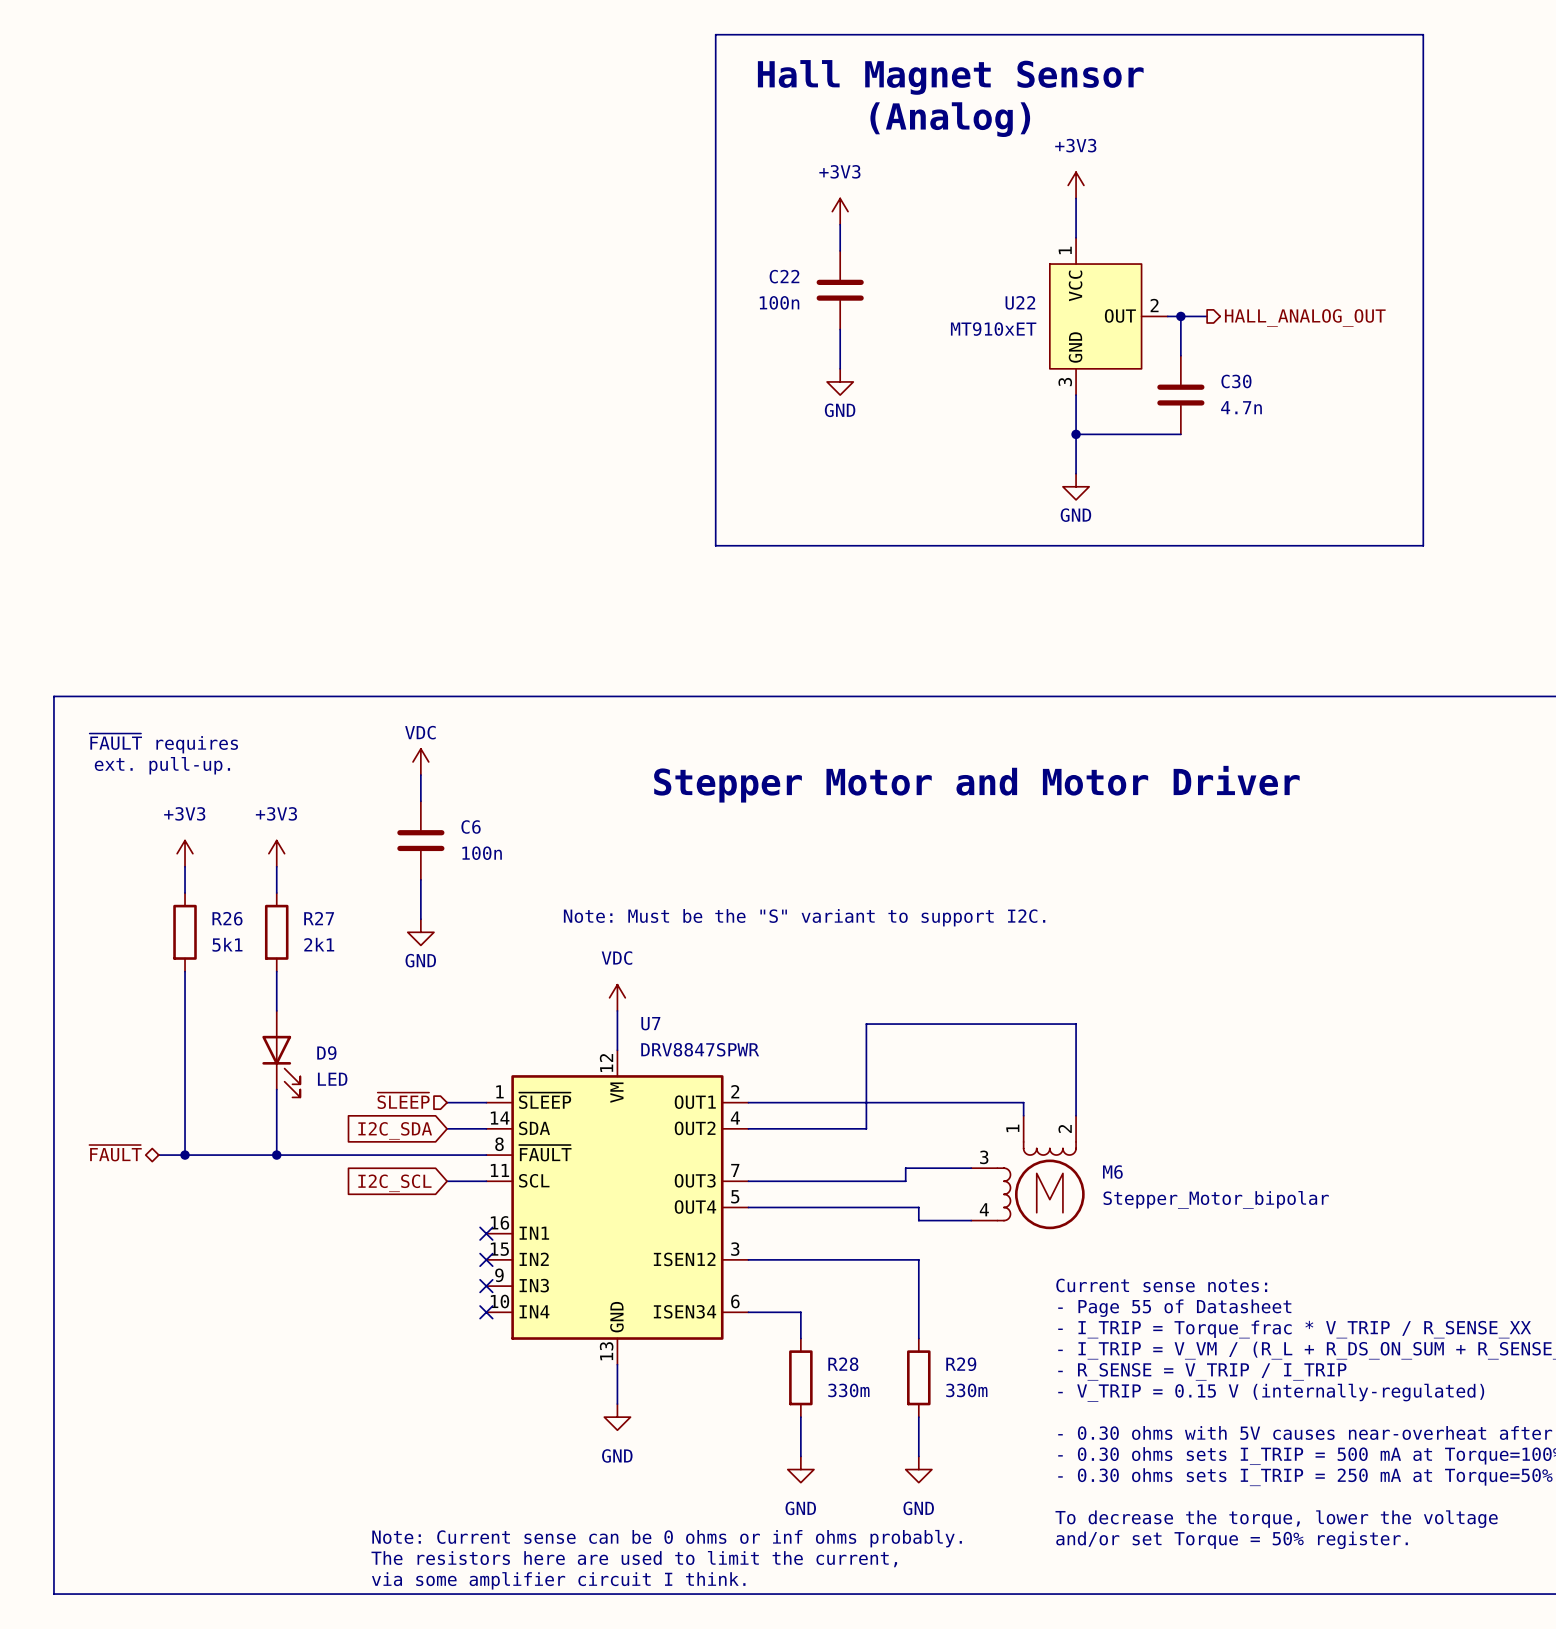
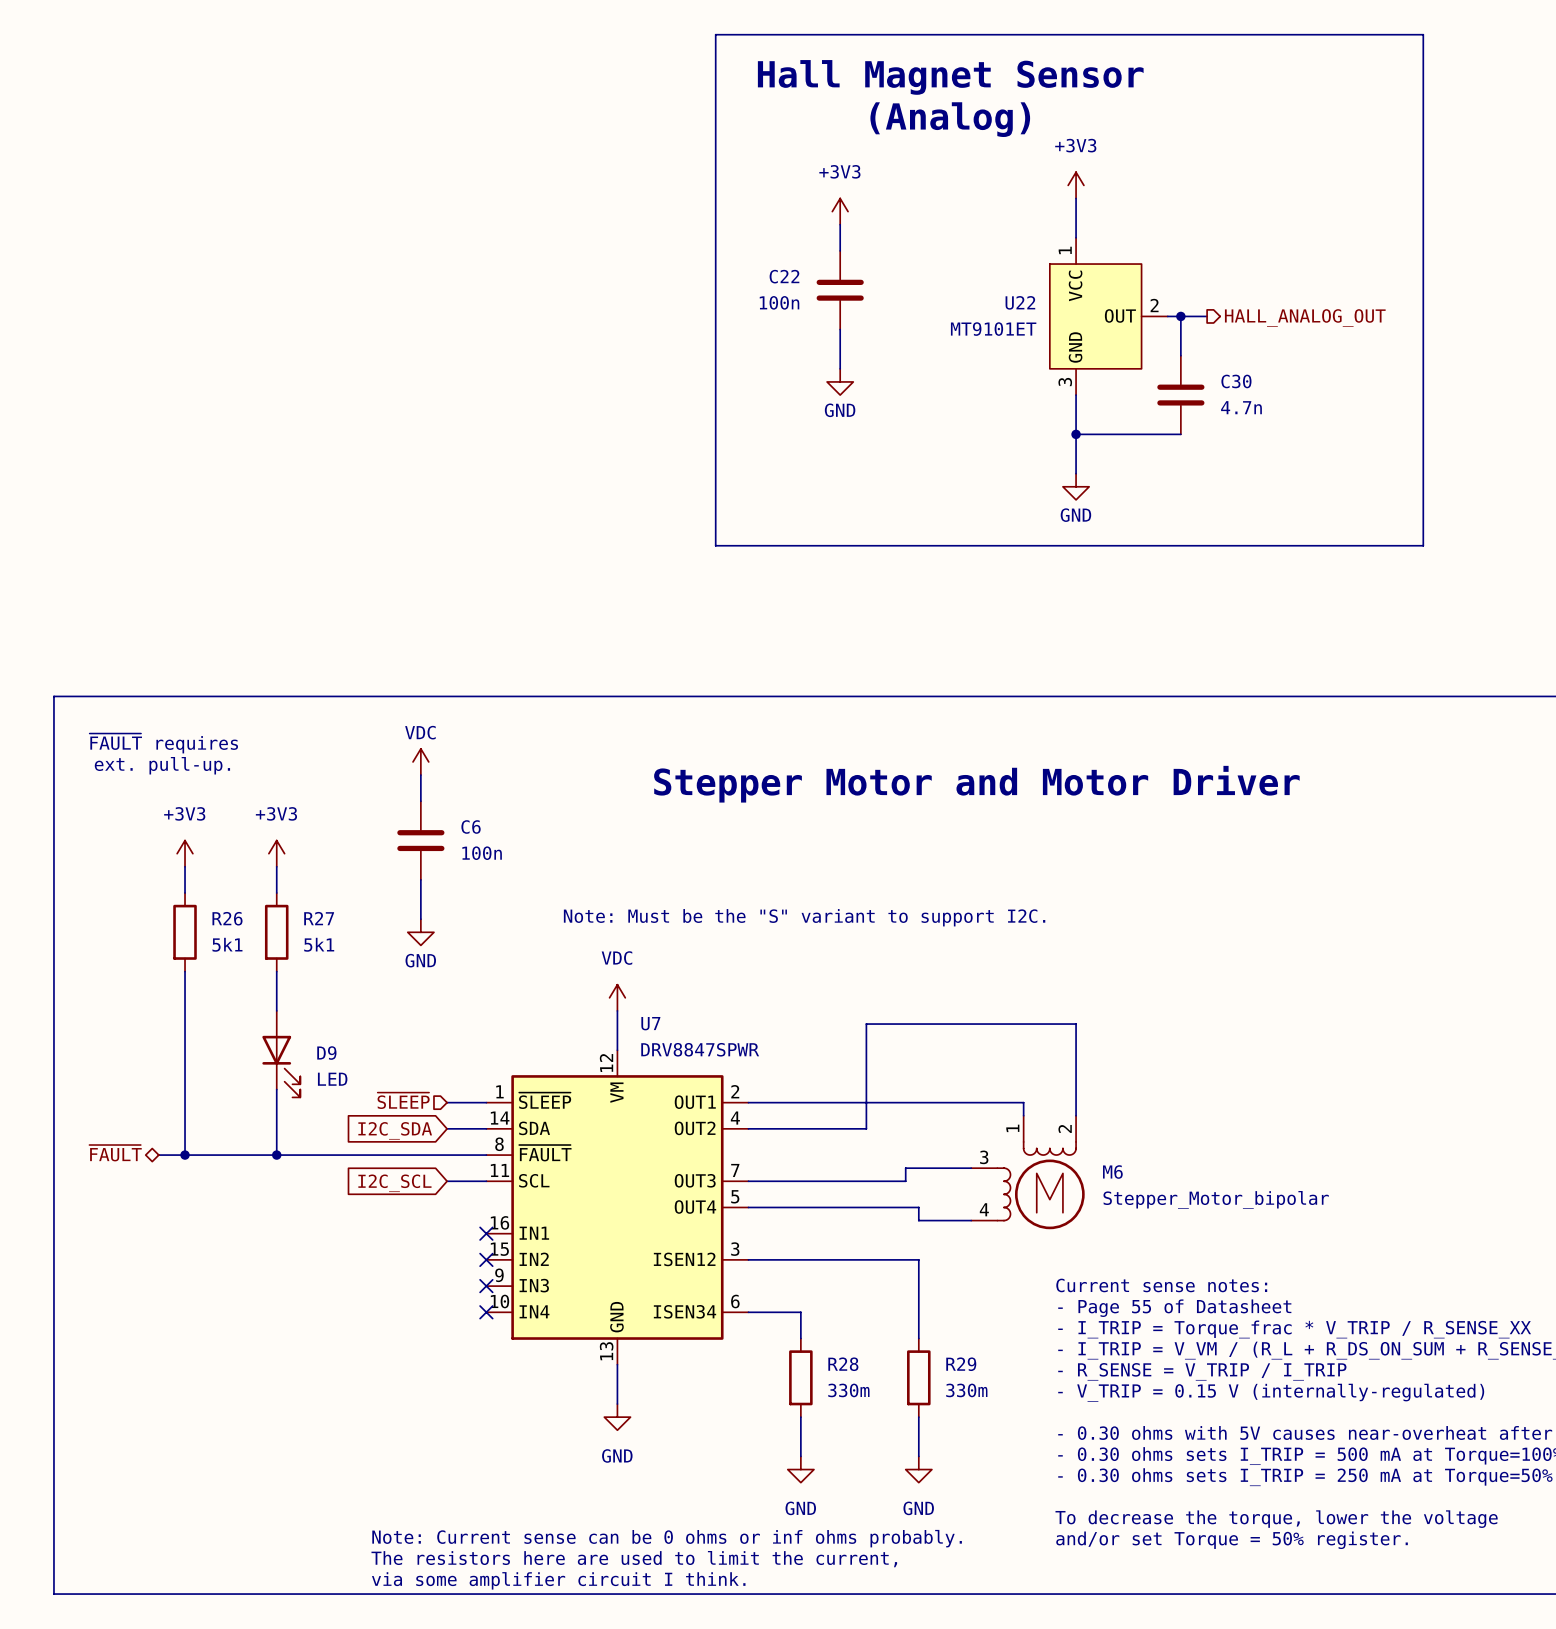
U22 value: MT910xET (993, 329) -> MT9101ET (993, 329)
R27 value: 2k1 (319, 944) -> 5k1 (319, 944)

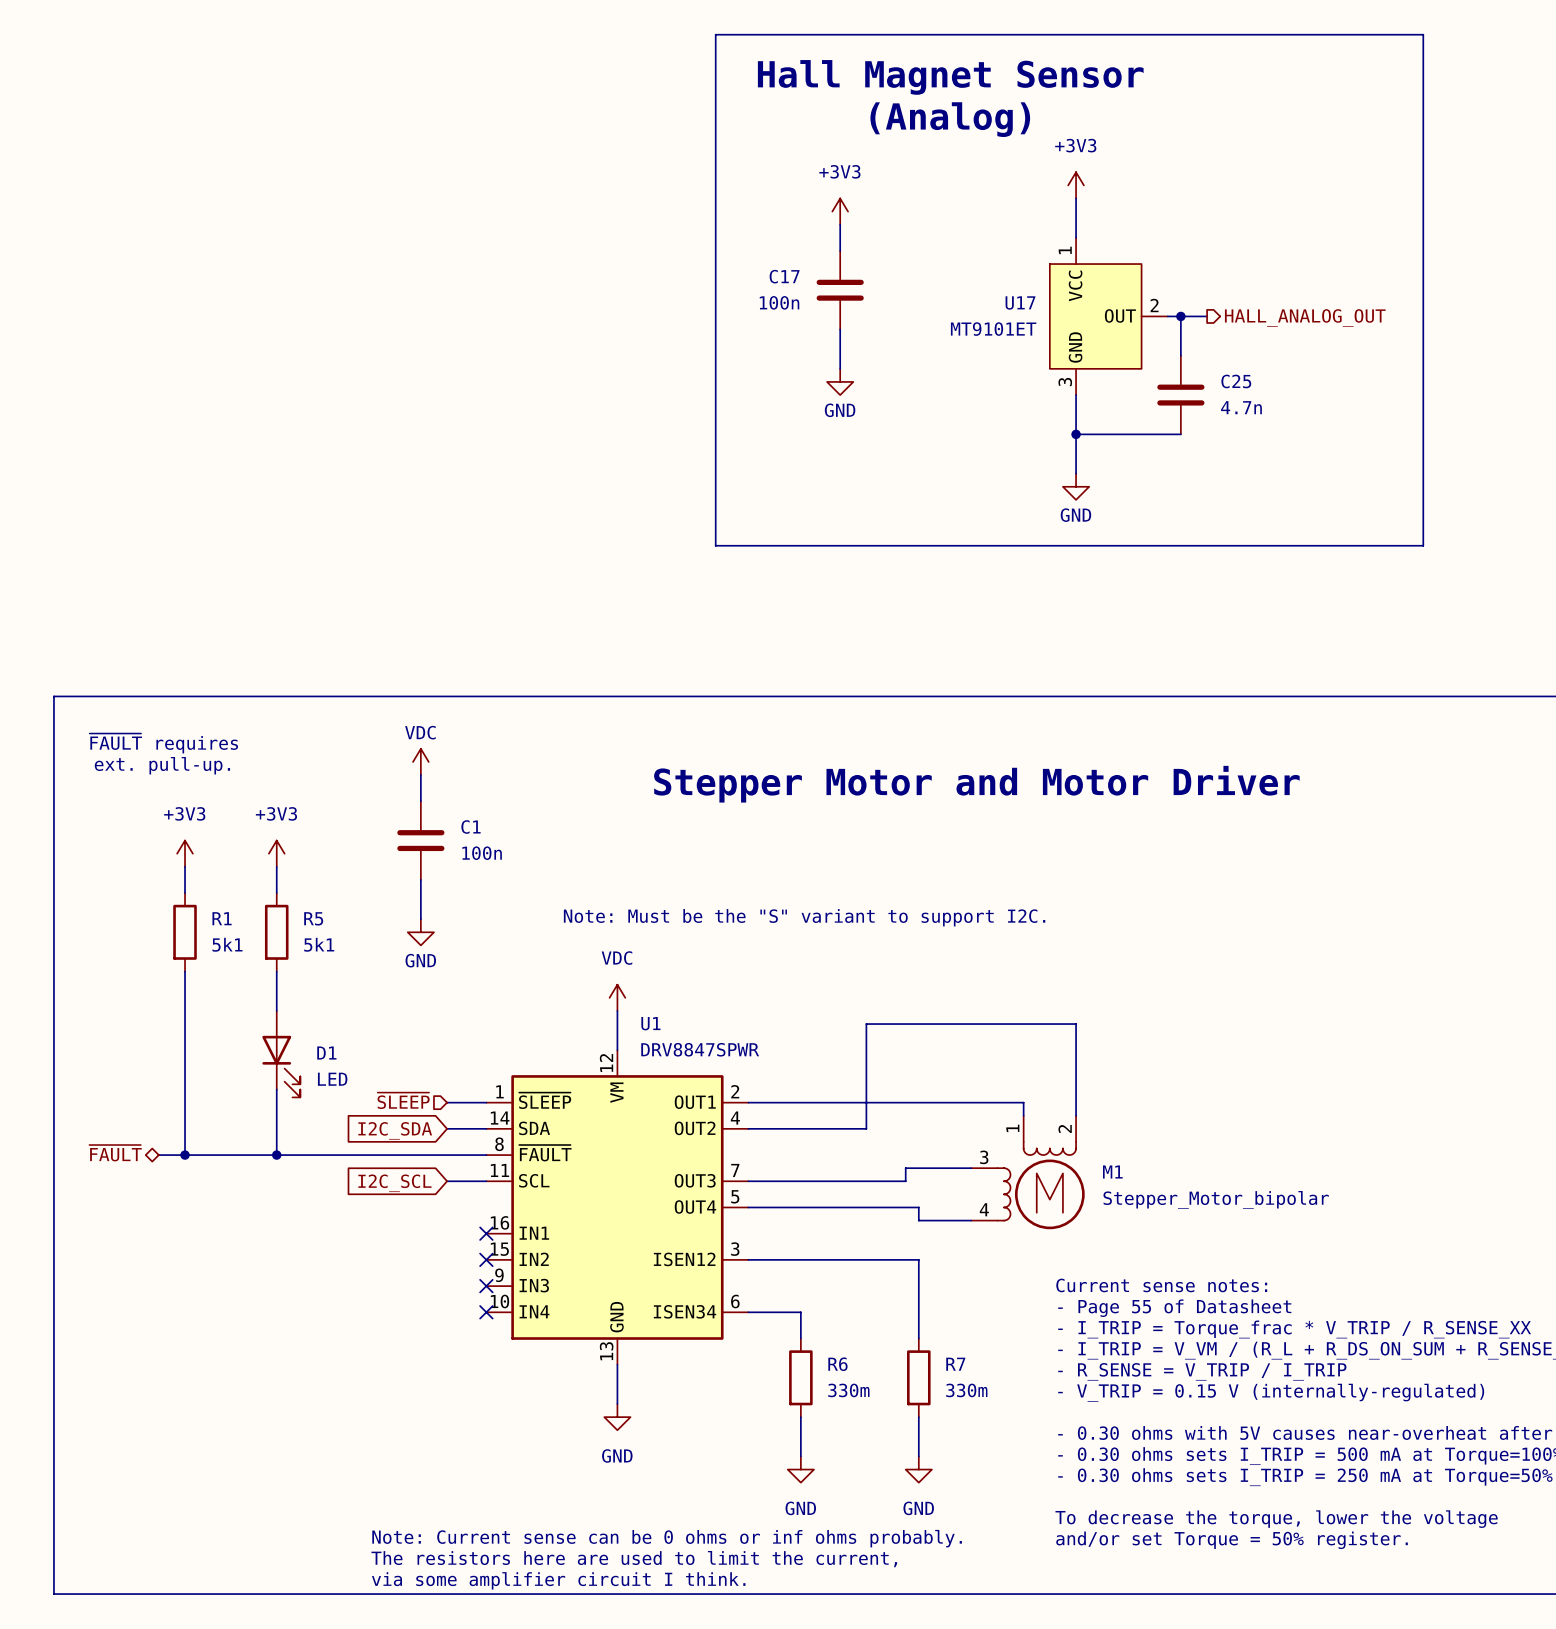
C22 name: C22 (784, 276) -> C17 (784, 276)
U22 name: U22 (1020, 302) -> U17 (1020, 302)
C30 name: C30 (1236, 381) -> C25 (1236, 381)
C6 name: C6 (471, 826) -> C1 (471, 826)
R26 name: R26 (227, 918) -> R1 (222, 918)
R27 name: R27 (319, 918) -> R5 (313, 918)
U7 name: U7 (650, 1023) -> U1 (650, 1023)
D9 name: D9 (326, 1053) -> D1 (326, 1053)
M6 name: M6 (1112, 1172) -> M1 (1112, 1172)
R28 name: R28 (843, 1364) -> R6 (837, 1364)
R29 name: R29 (961, 1364) -> R7 (955, 1364)

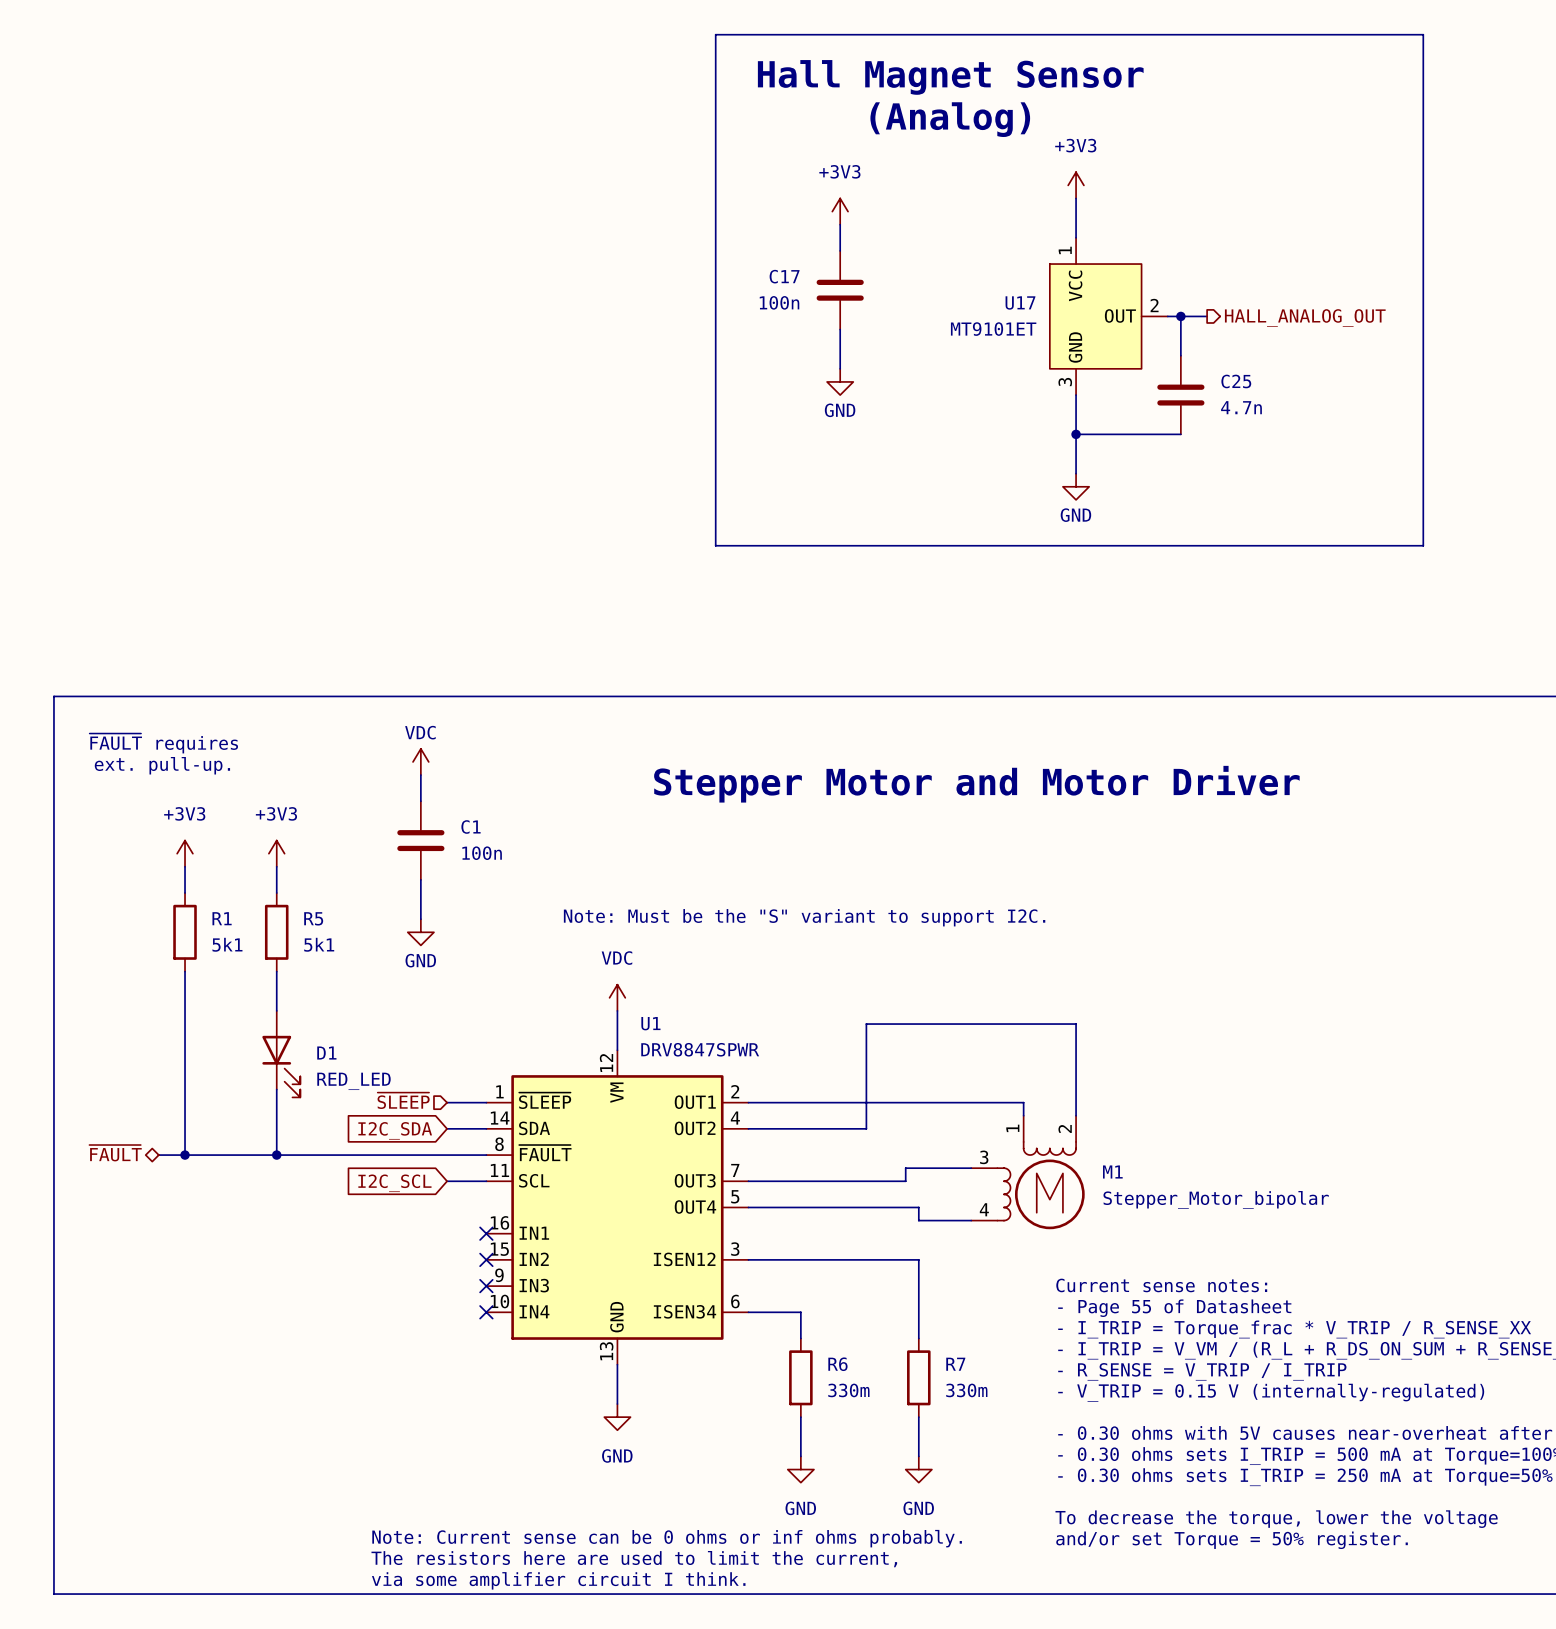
D1 value: LED (332, 1079) -> RED_LED (353, 1081)

